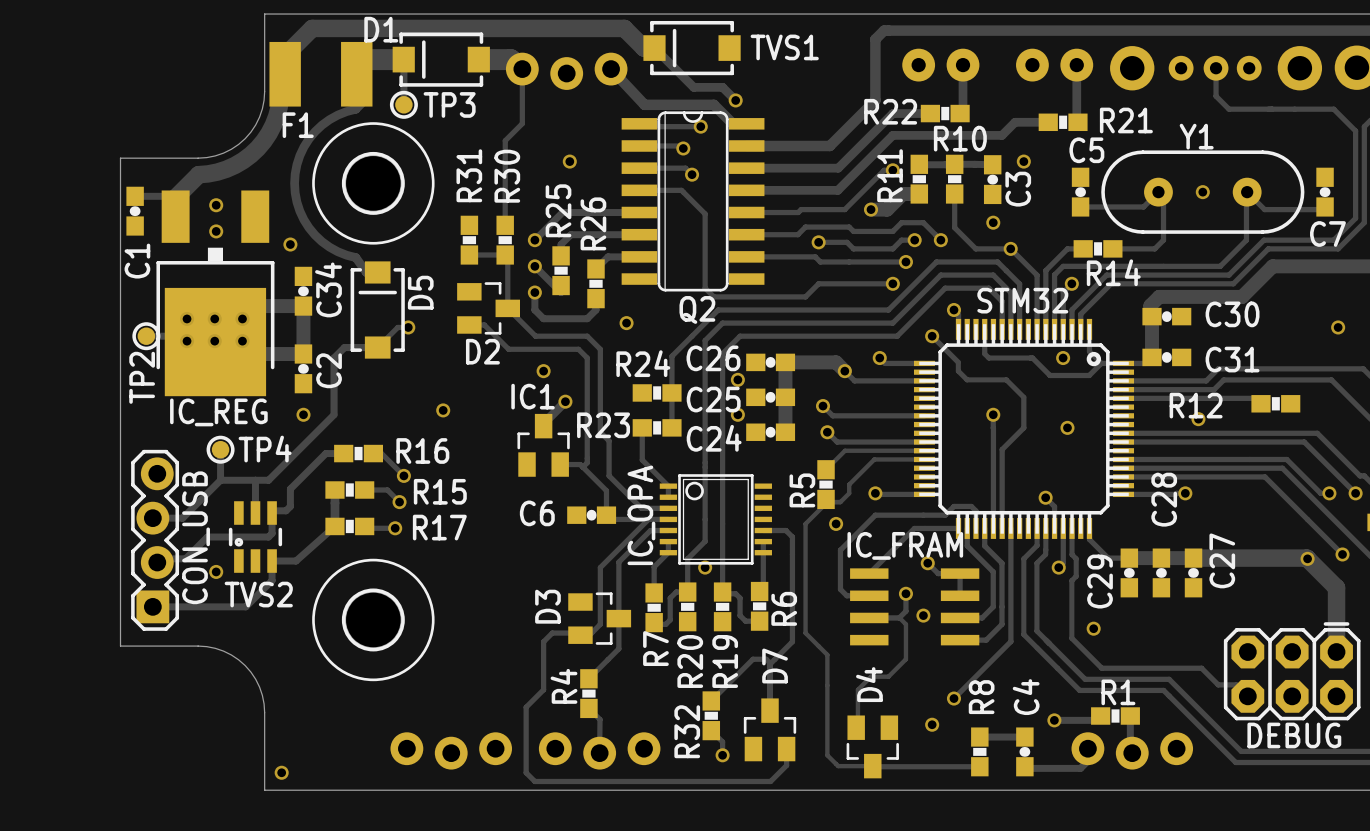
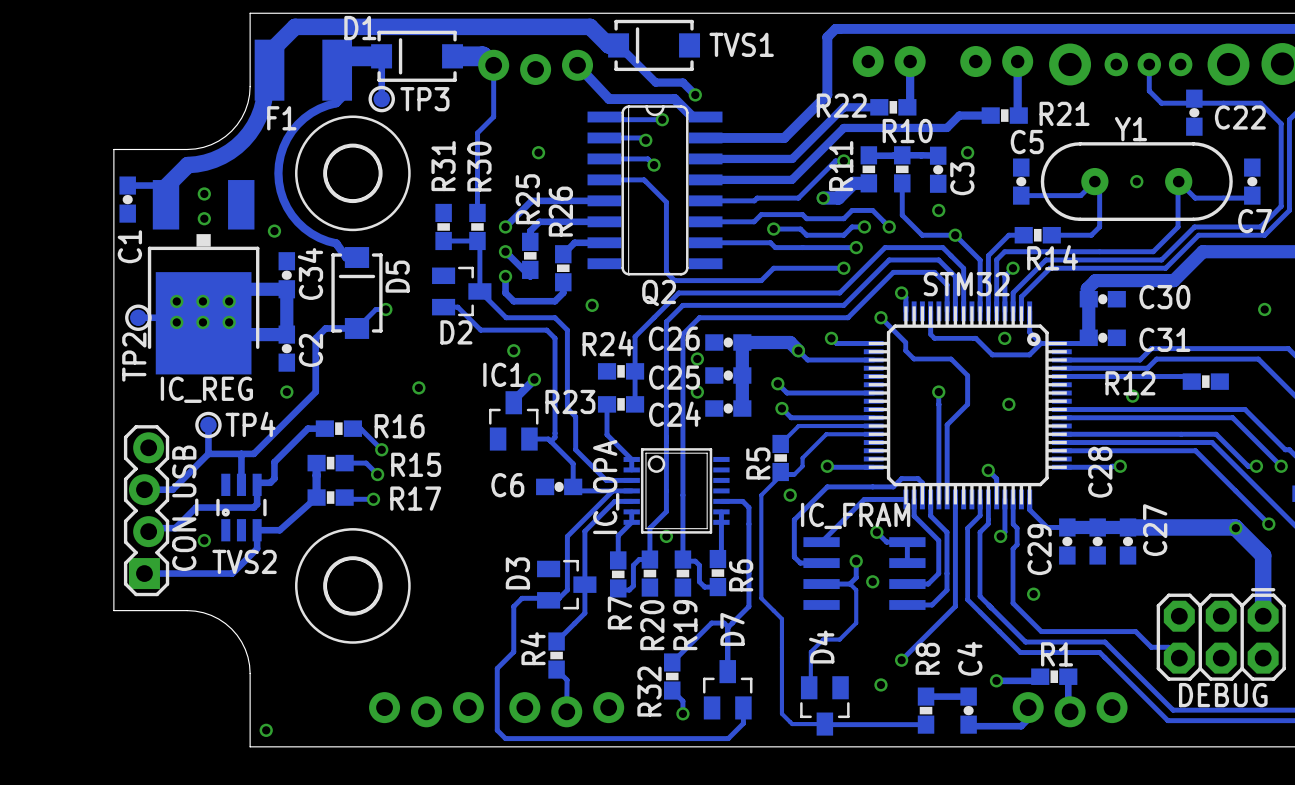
C22: none -> (1194, 112)

